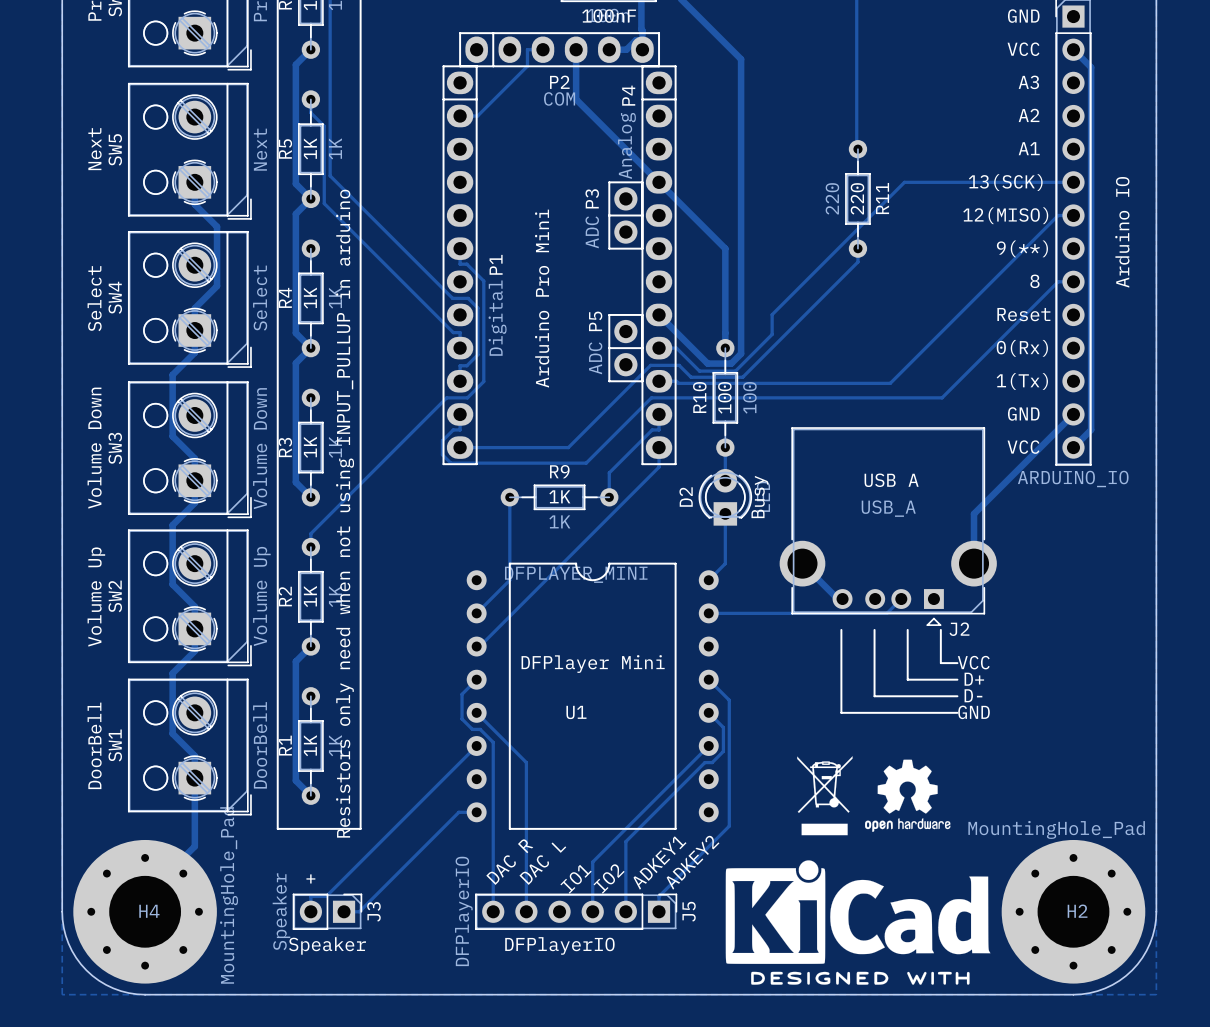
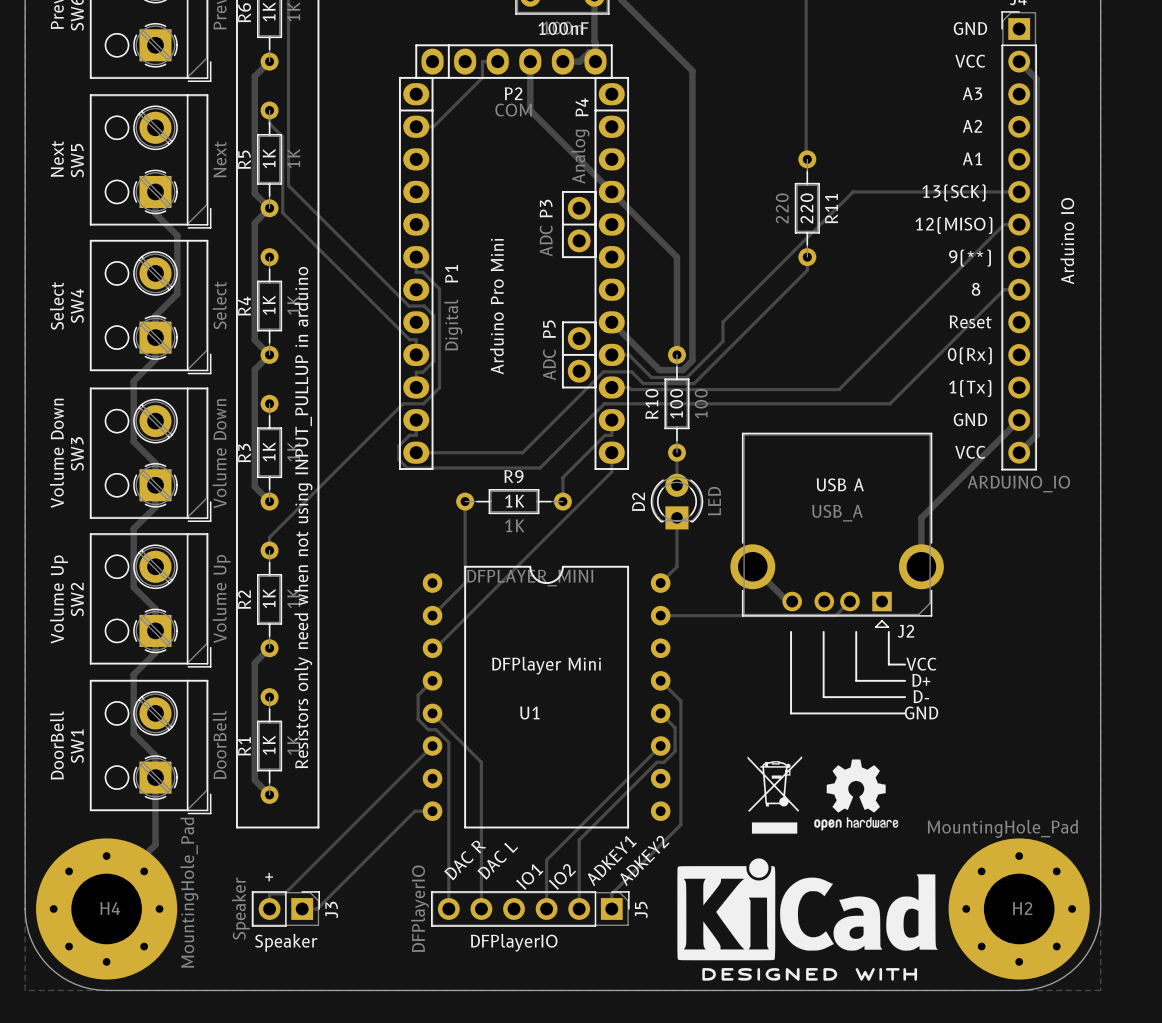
text: Busy (759, 497) -> none

